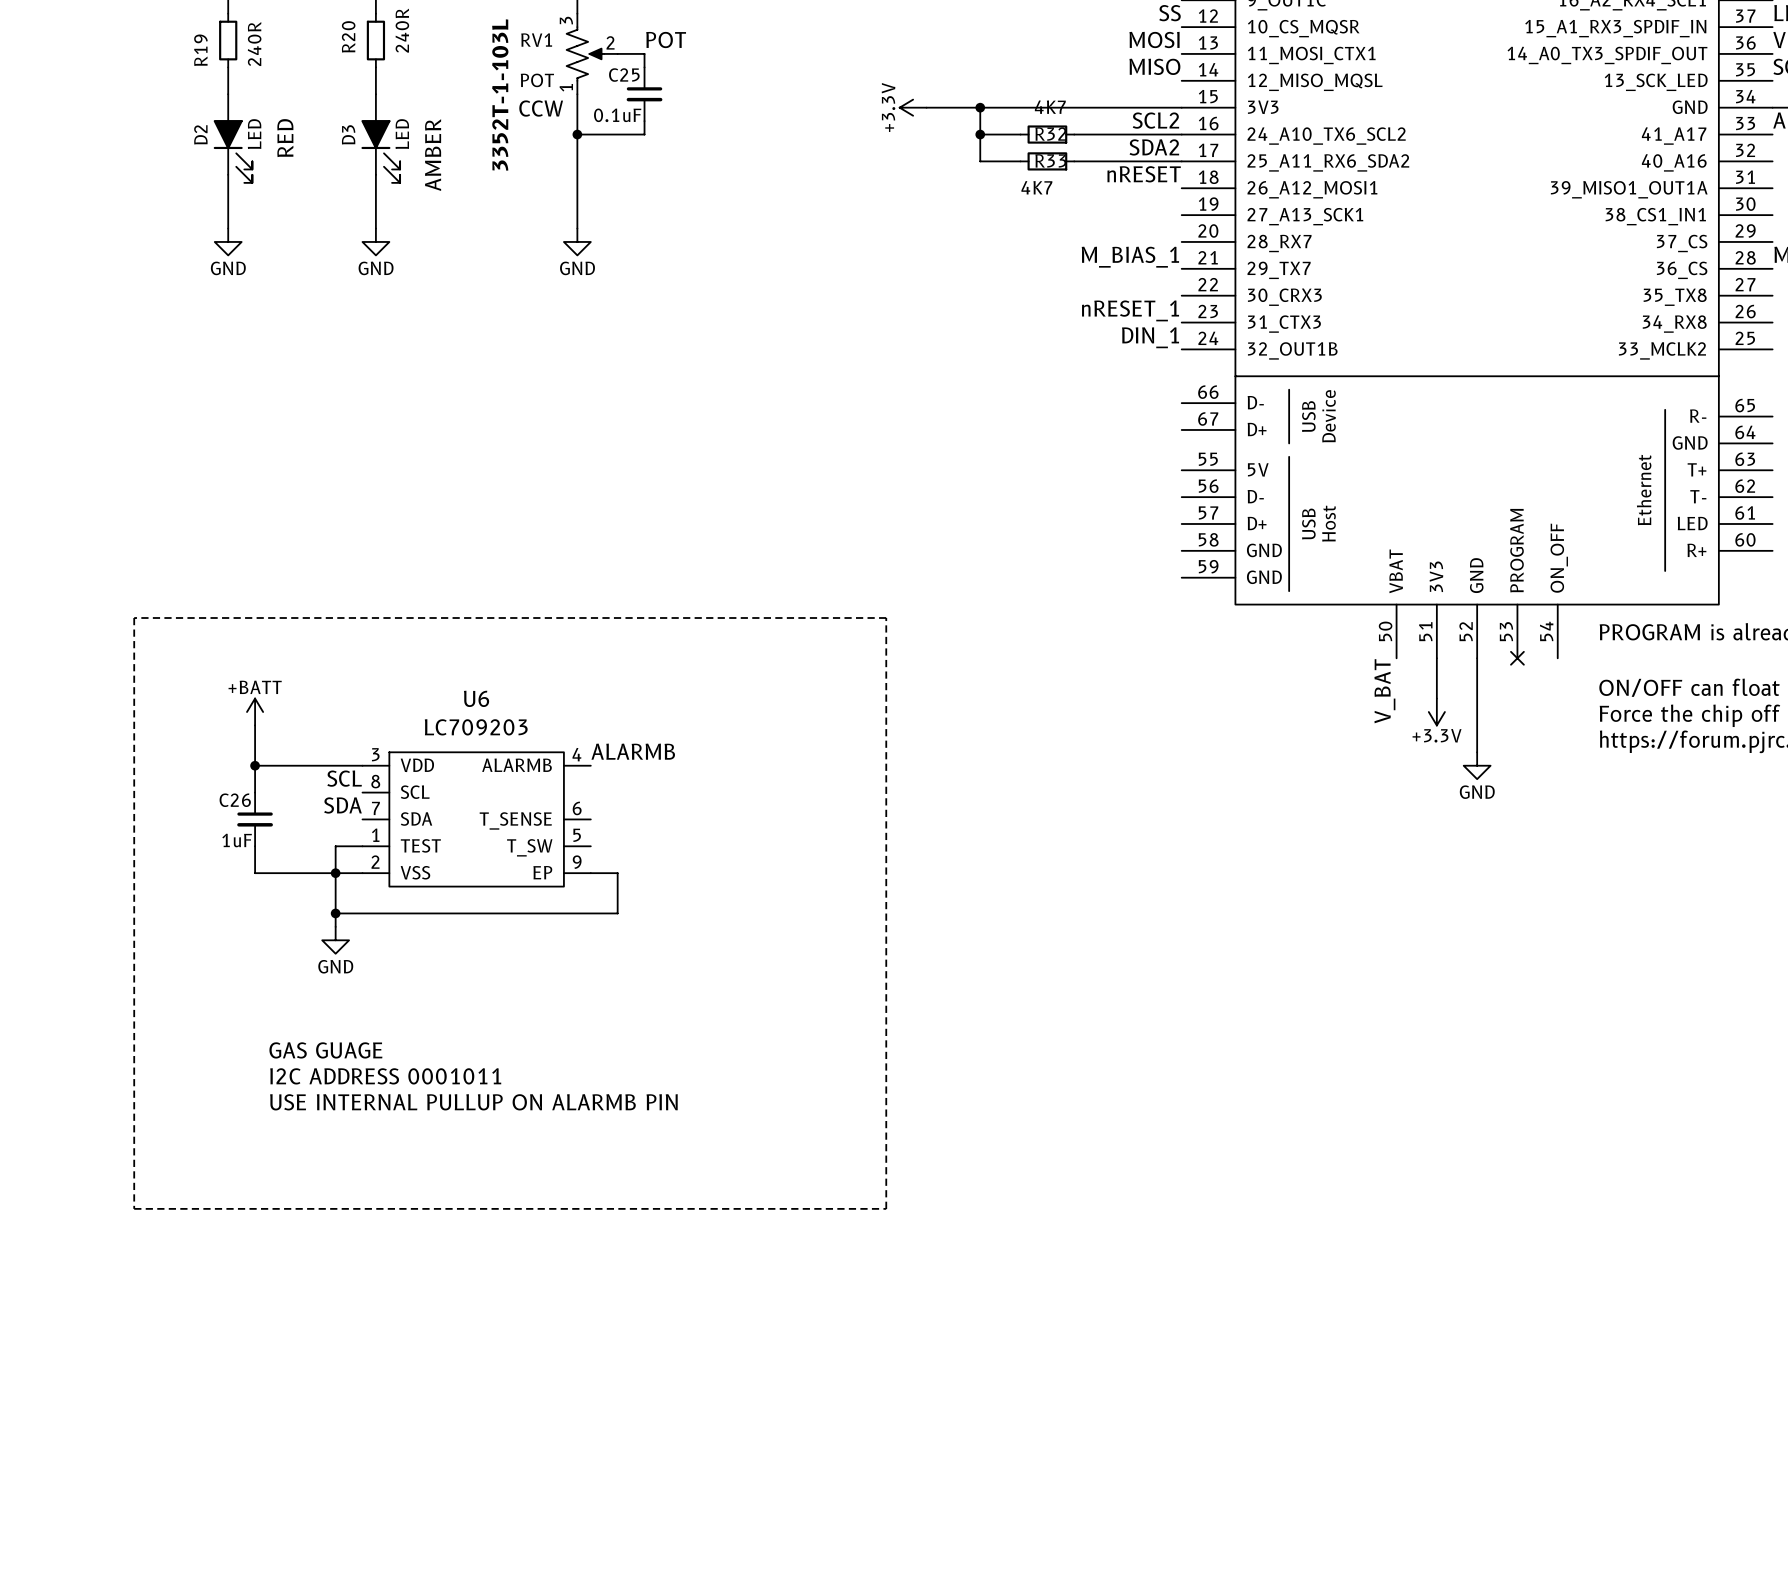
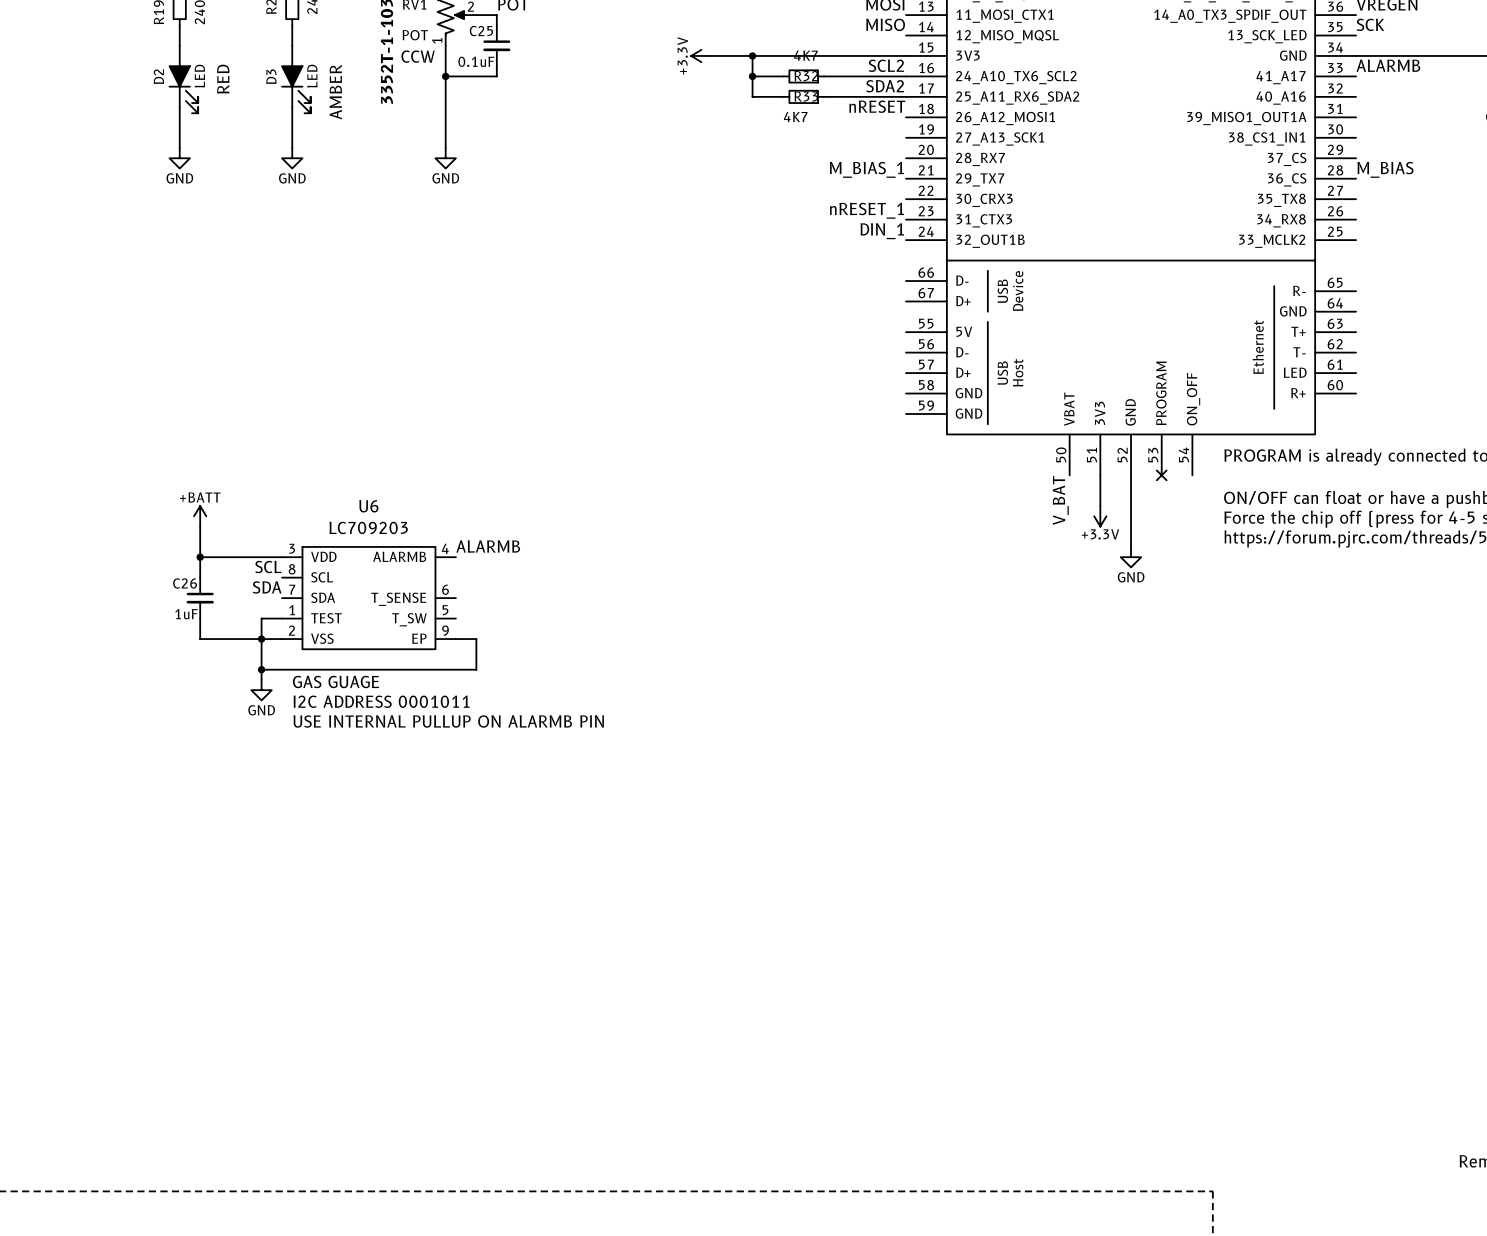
line: (134, 618) (134, 1208) (886, 1208) (886, 618) (134, 618) -> none
text position: GAS GUAGE (325, 1050) -> GAS GUAGE (335, 681)
text position: I2C ADDRESS 0001011 (385, 1076) -> I2C ADDRESS 0001011 (381, 701)
text position: USE INTERNAL PULLUP ON ALARMB PIN (473, 1102) -> USE INTERNAL PULLUP ON ALARMB PIN (448, 721)

